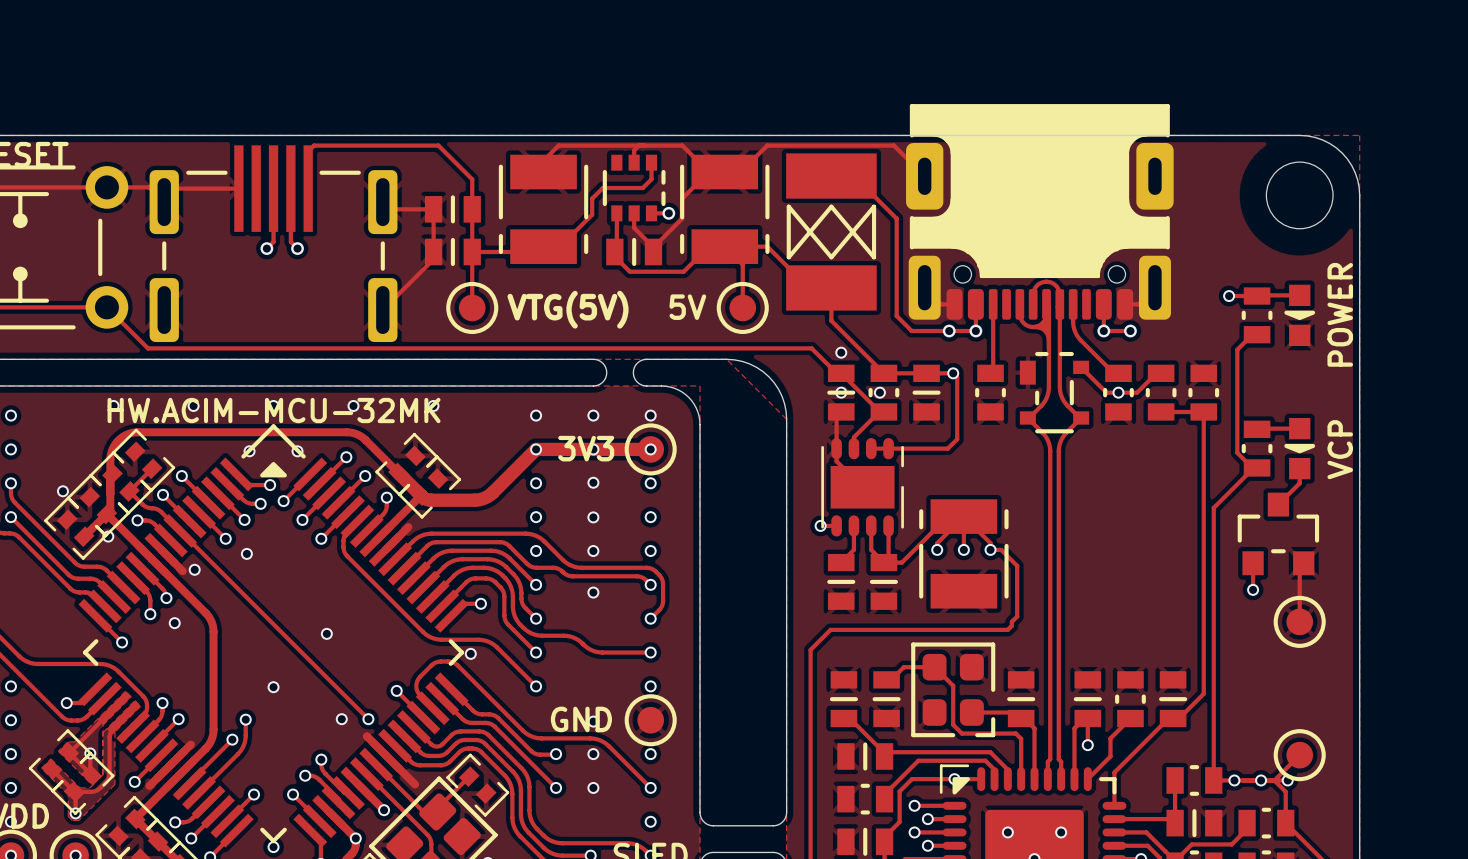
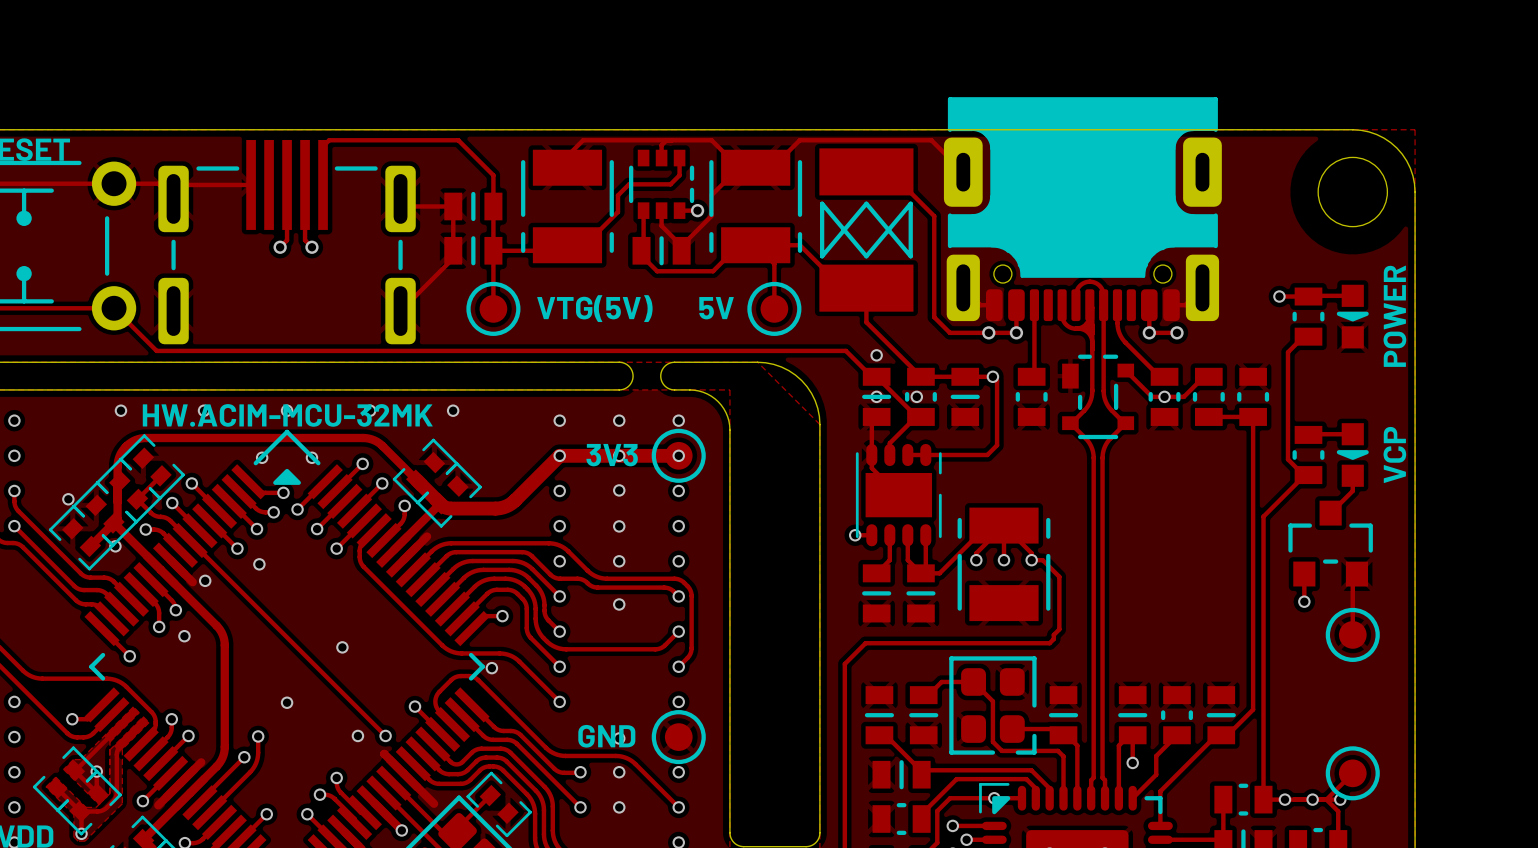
track: (663, 600) (660, 608) (650, 618) -> (691, 612) (691, 650) (688, 656) (678, 666)
track: (563, 635) (576, 638) (587, 648) (597, 652) (650, 652) -> (588, 649) (657, 649) (664, 646) (678, 631)

